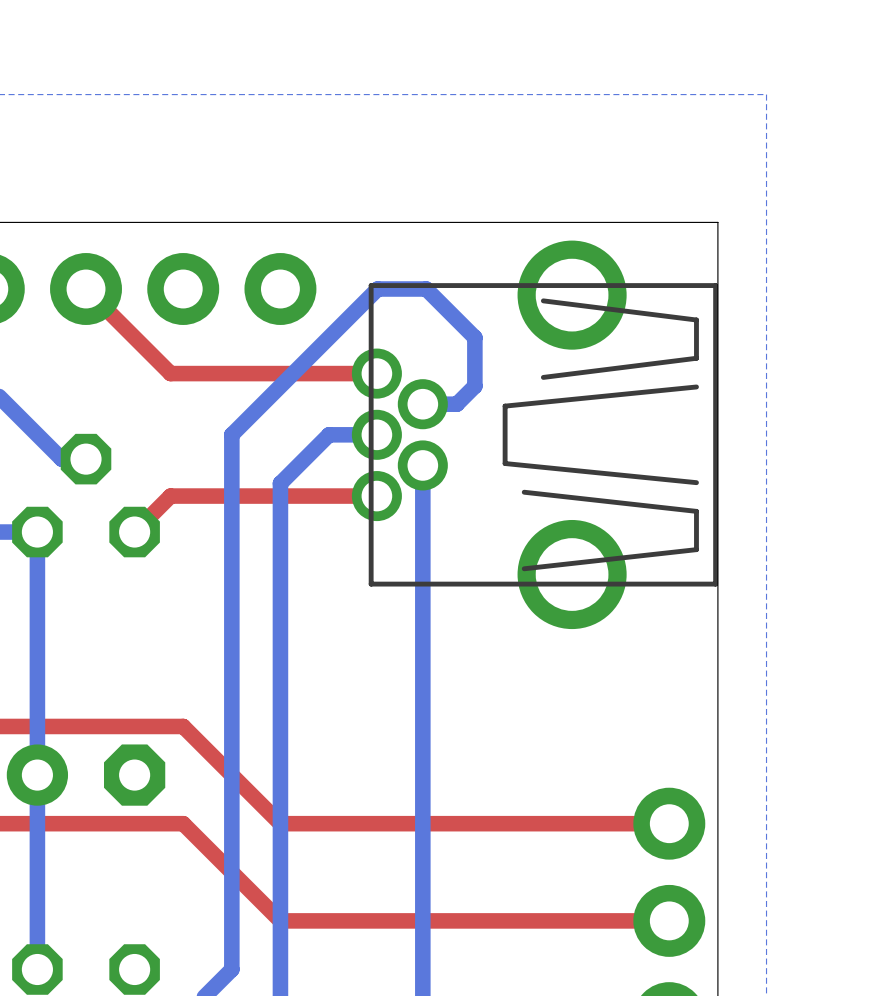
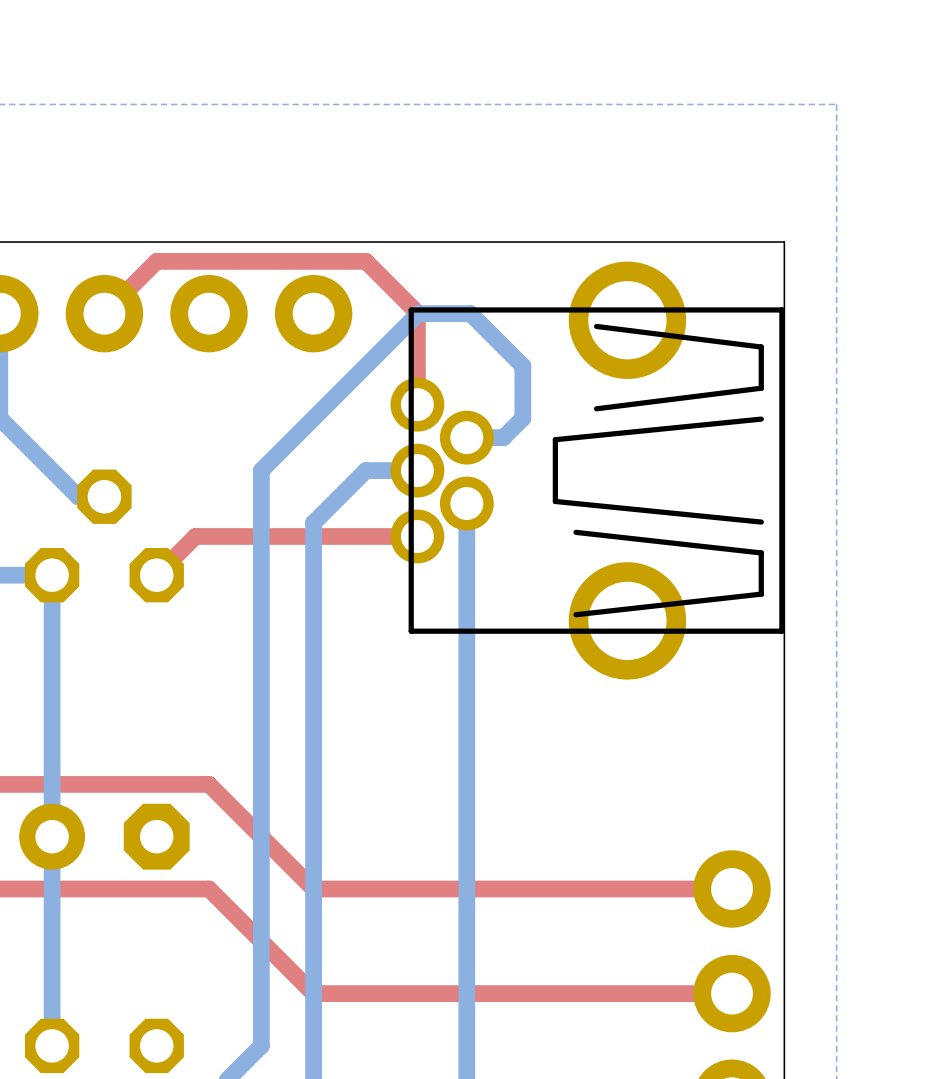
top track: (86, 289) (170, 373) (376, 373) -> (104, 313) (156, 261) (365, 261) (417, 312) (417, 404)

